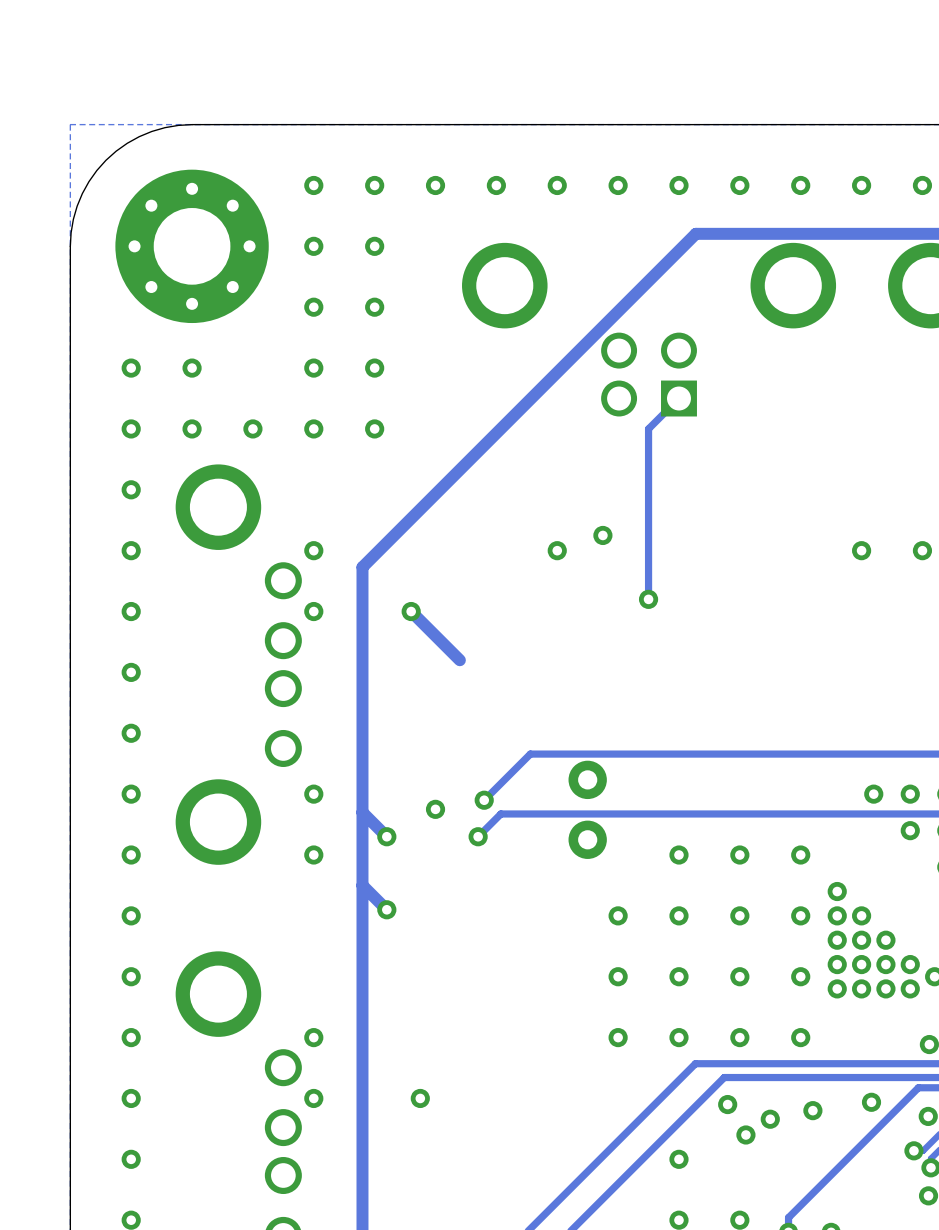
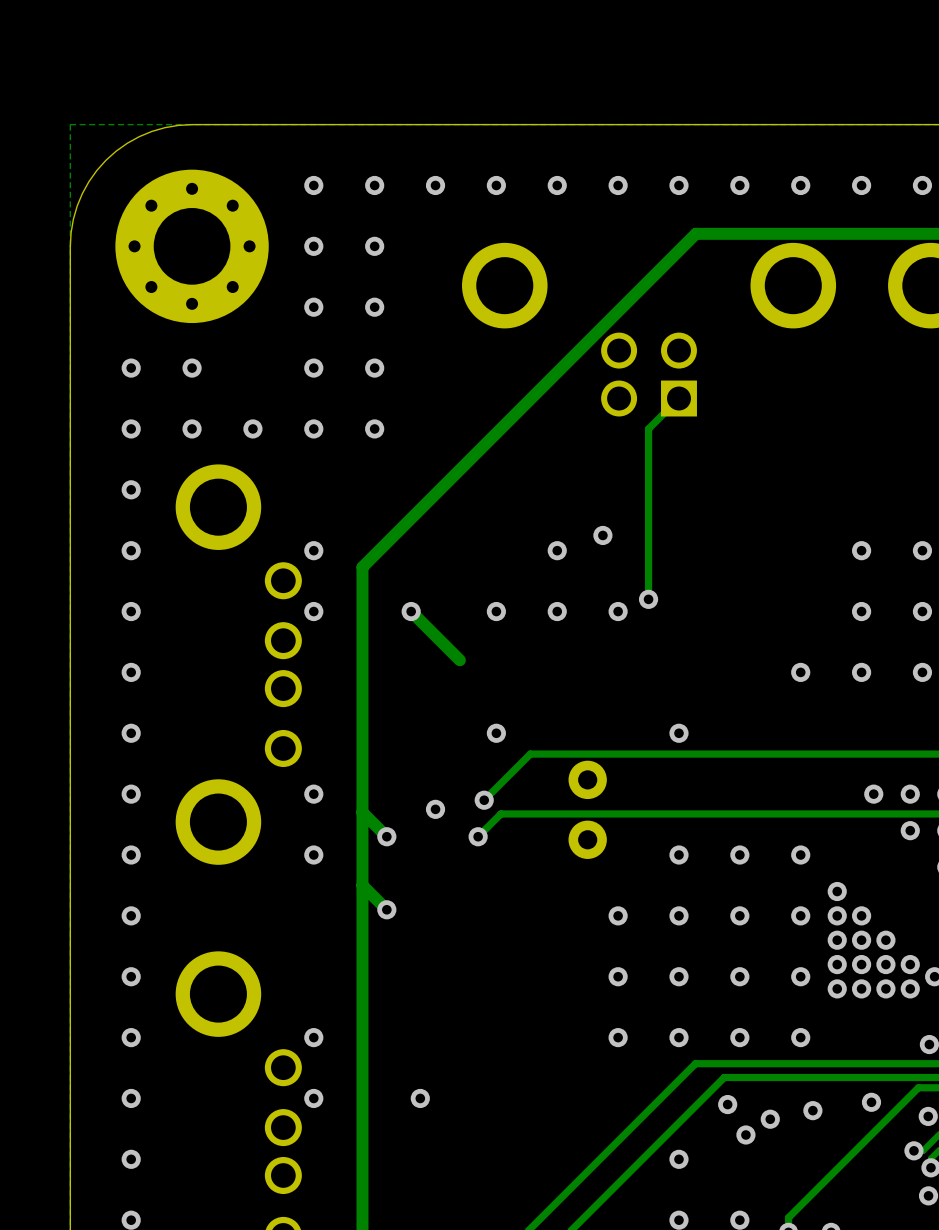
via: none -> (496, 611)
via: none -> (557, 611)
via: none -> (618, 611)
via: none -> (861, 611)
via: none -> (922, 611)
via: none -> (800, 672)
via: none -> (861, 672)
via: none -> (922, 672)
via: none -> (496, 733)
via: none -> (678, 733)

